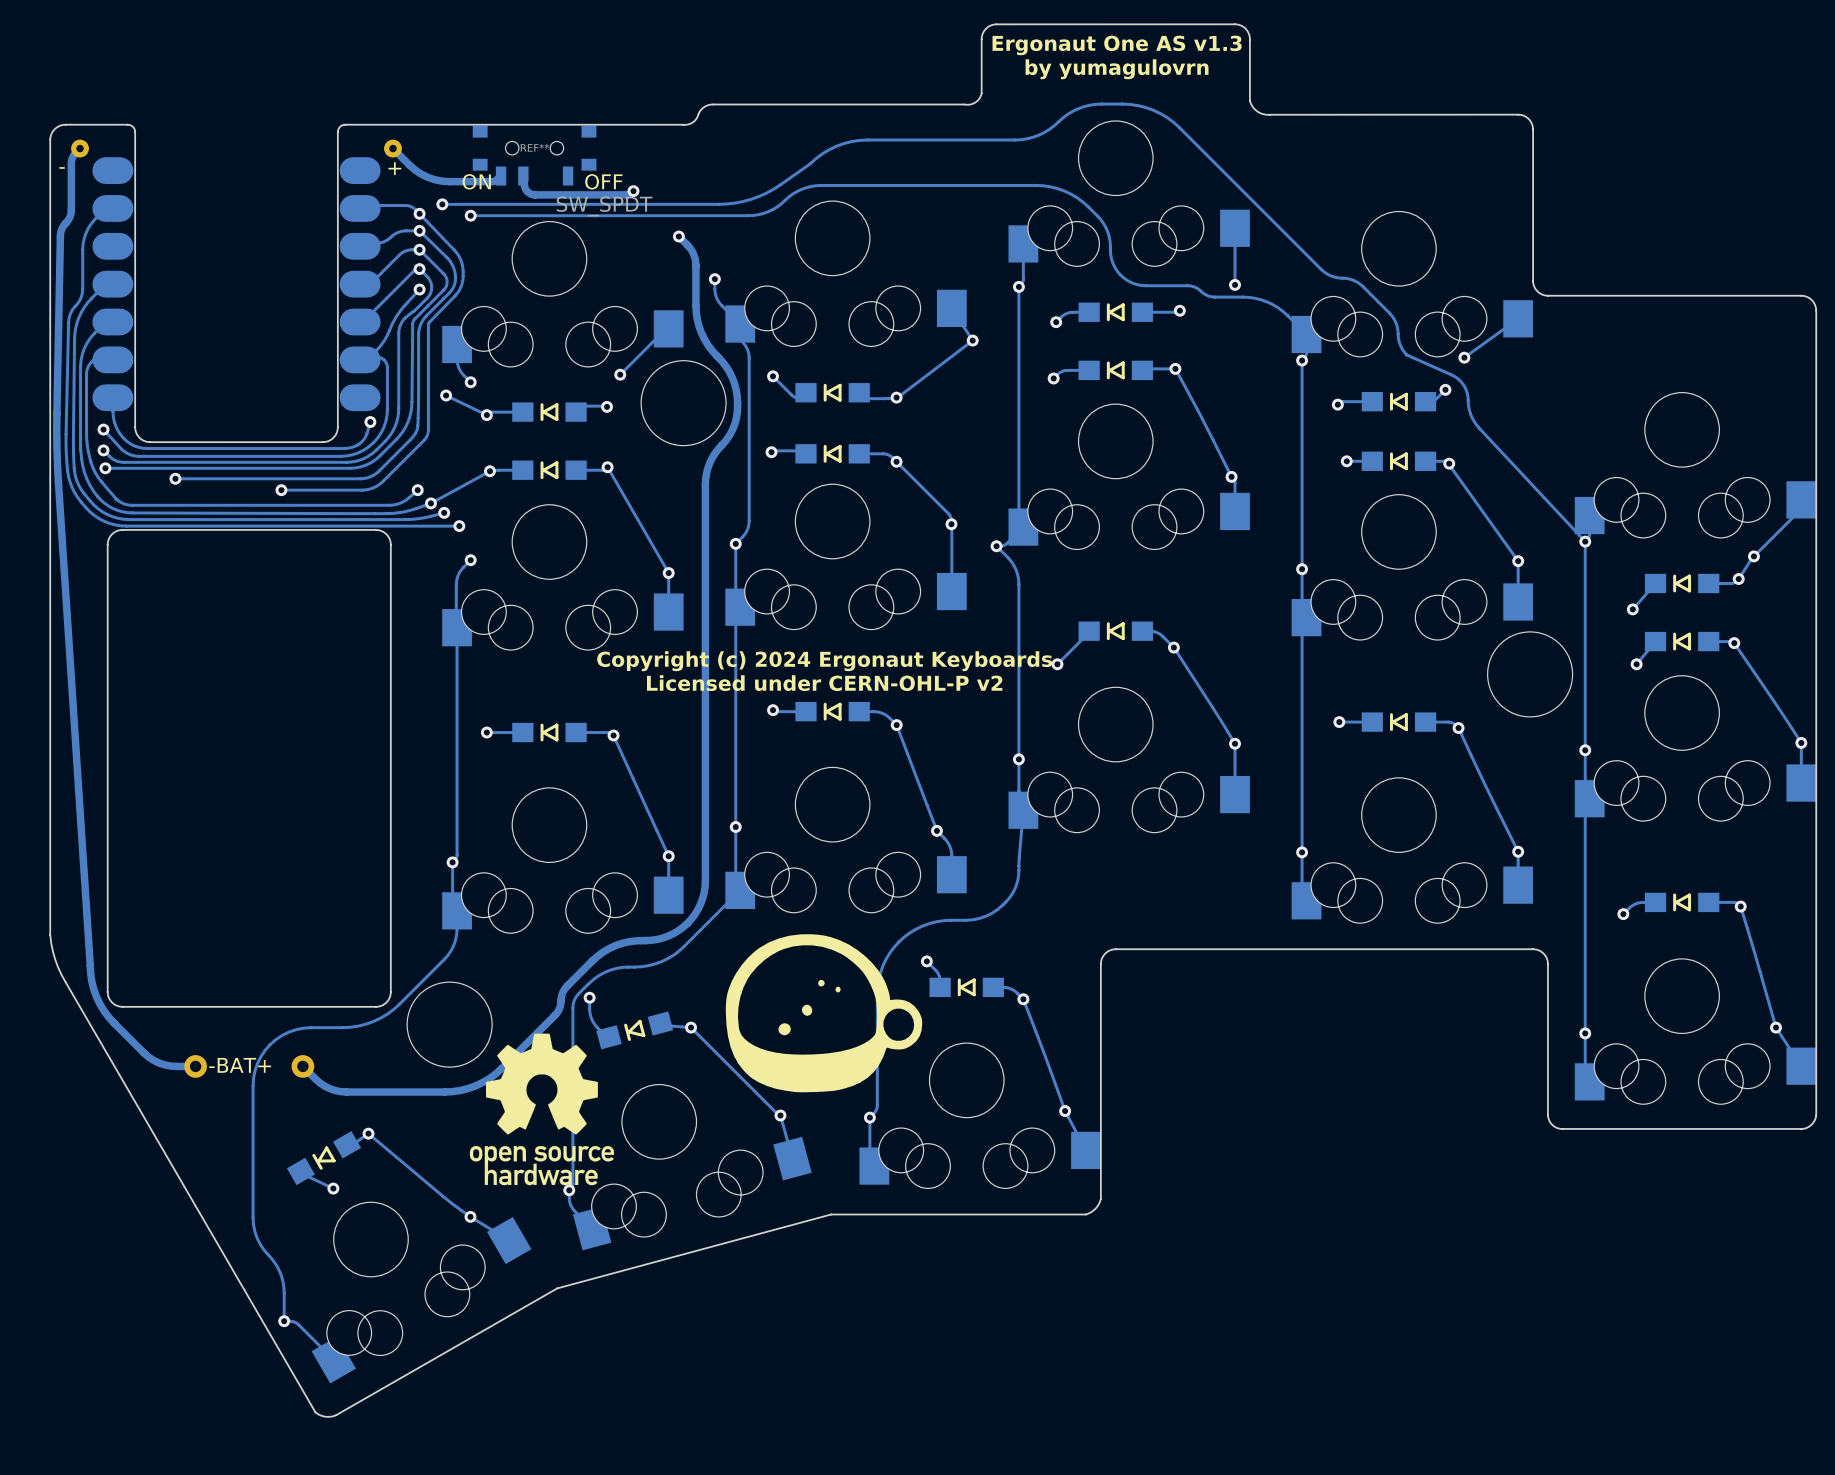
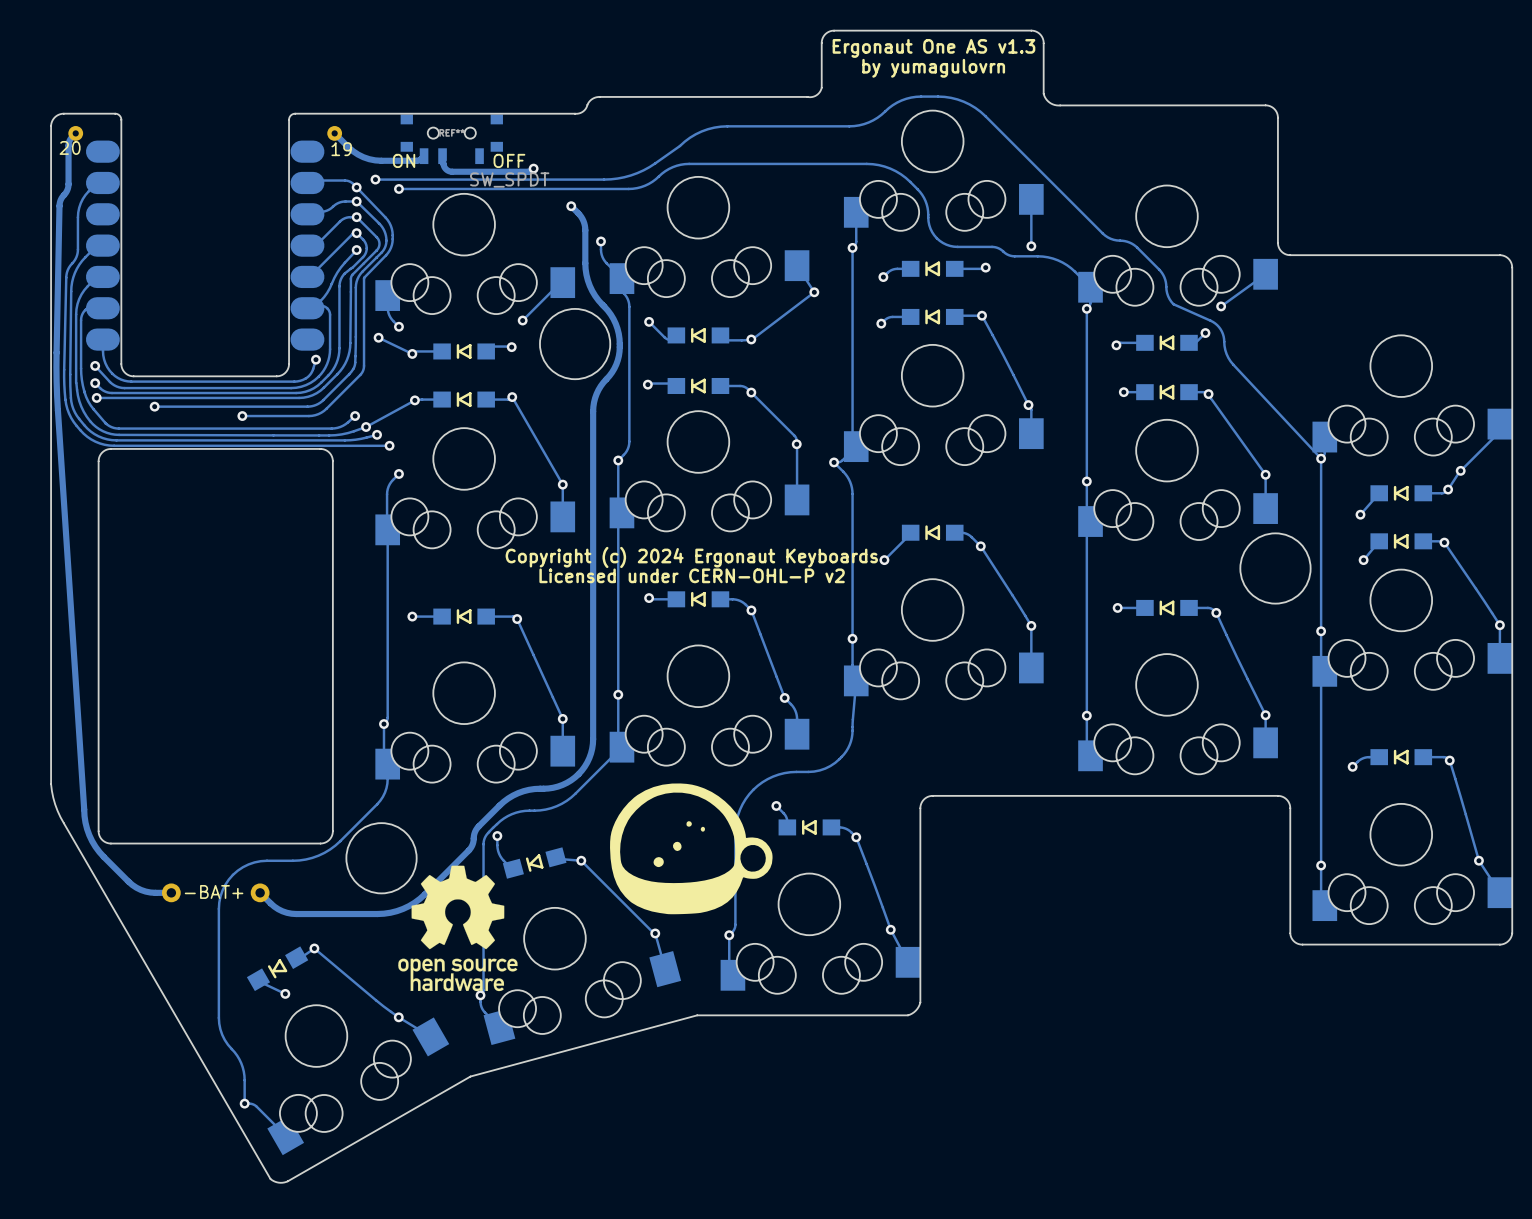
part text: - (62, 167) -> 20 (70, 147)
part text: + (394, 168) -> 19 (341, 149)

